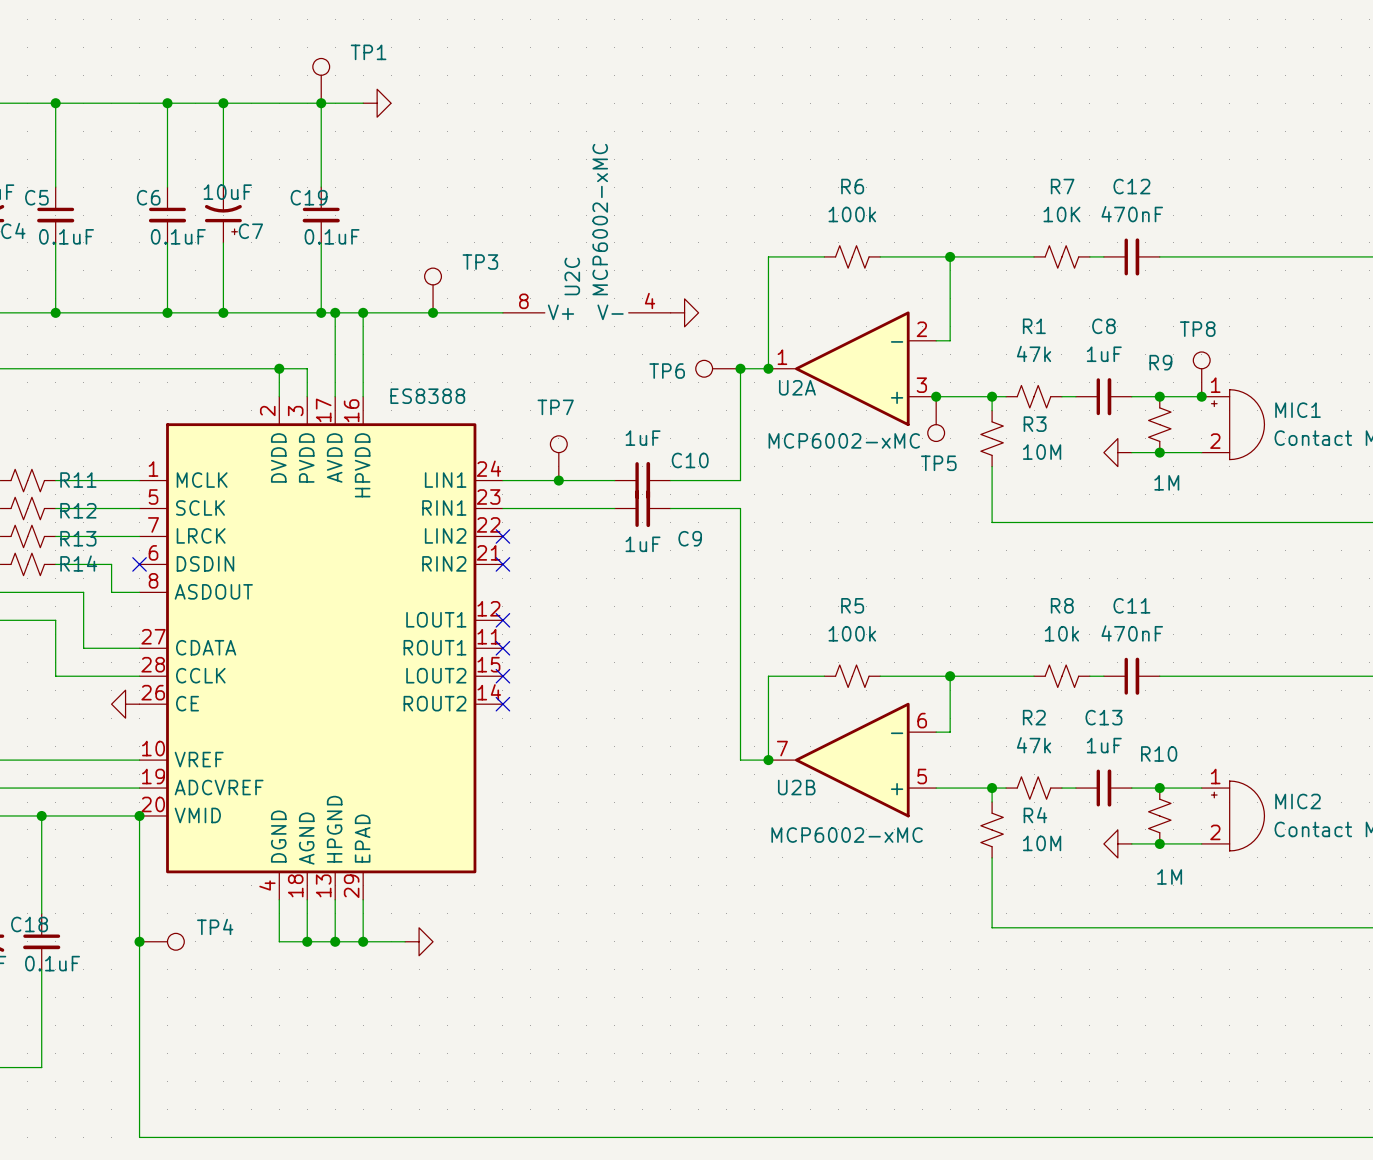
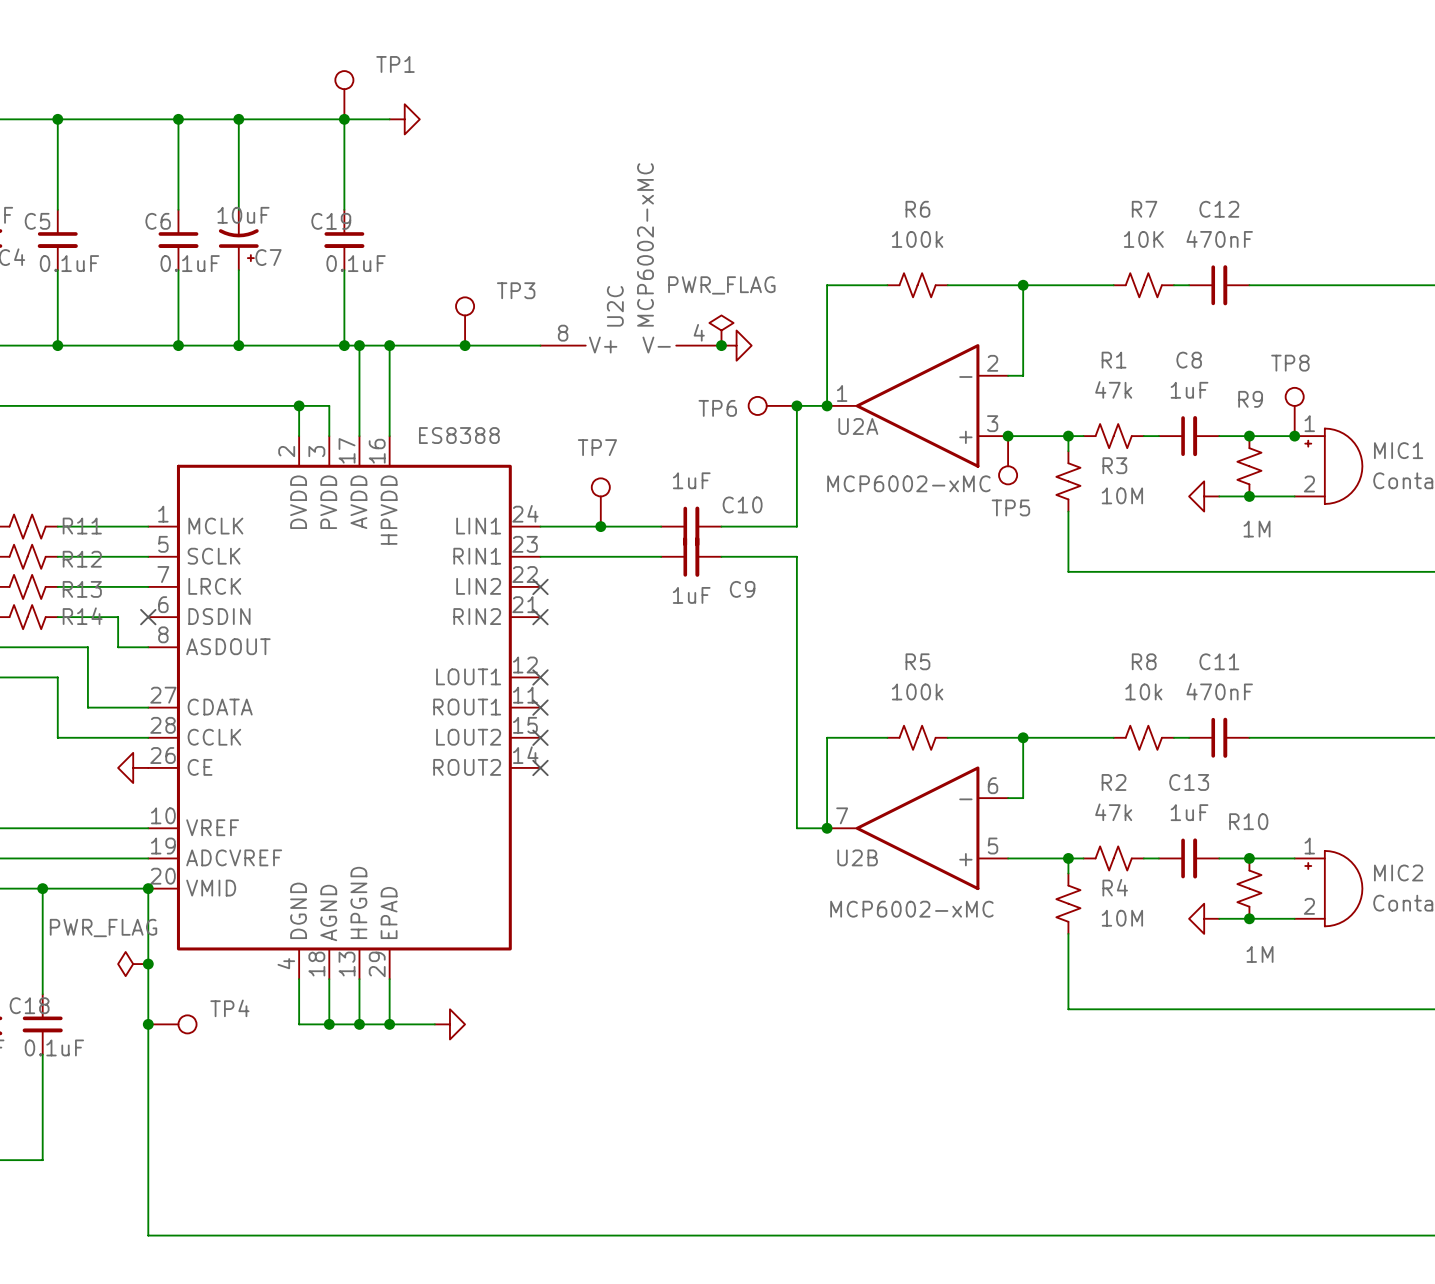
power symbol: none -> PWR_FLAG (721, 330)
junction: none -> (721, 345)
power symbol: none -> PWR_FLAG (133, 964)
junction: none -> (148, 964)

